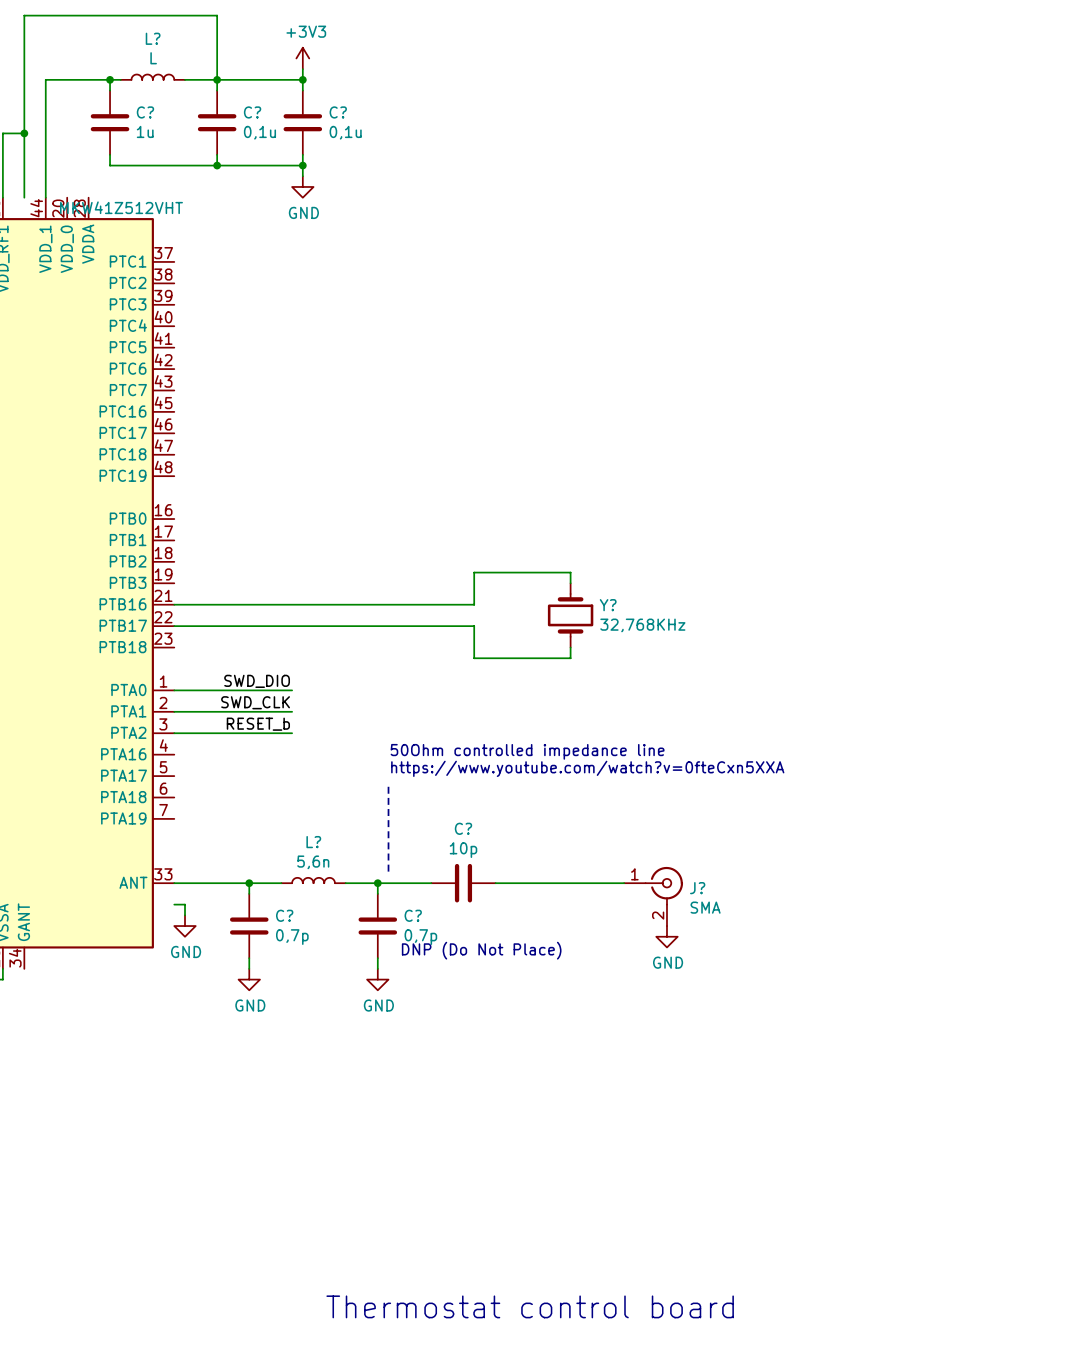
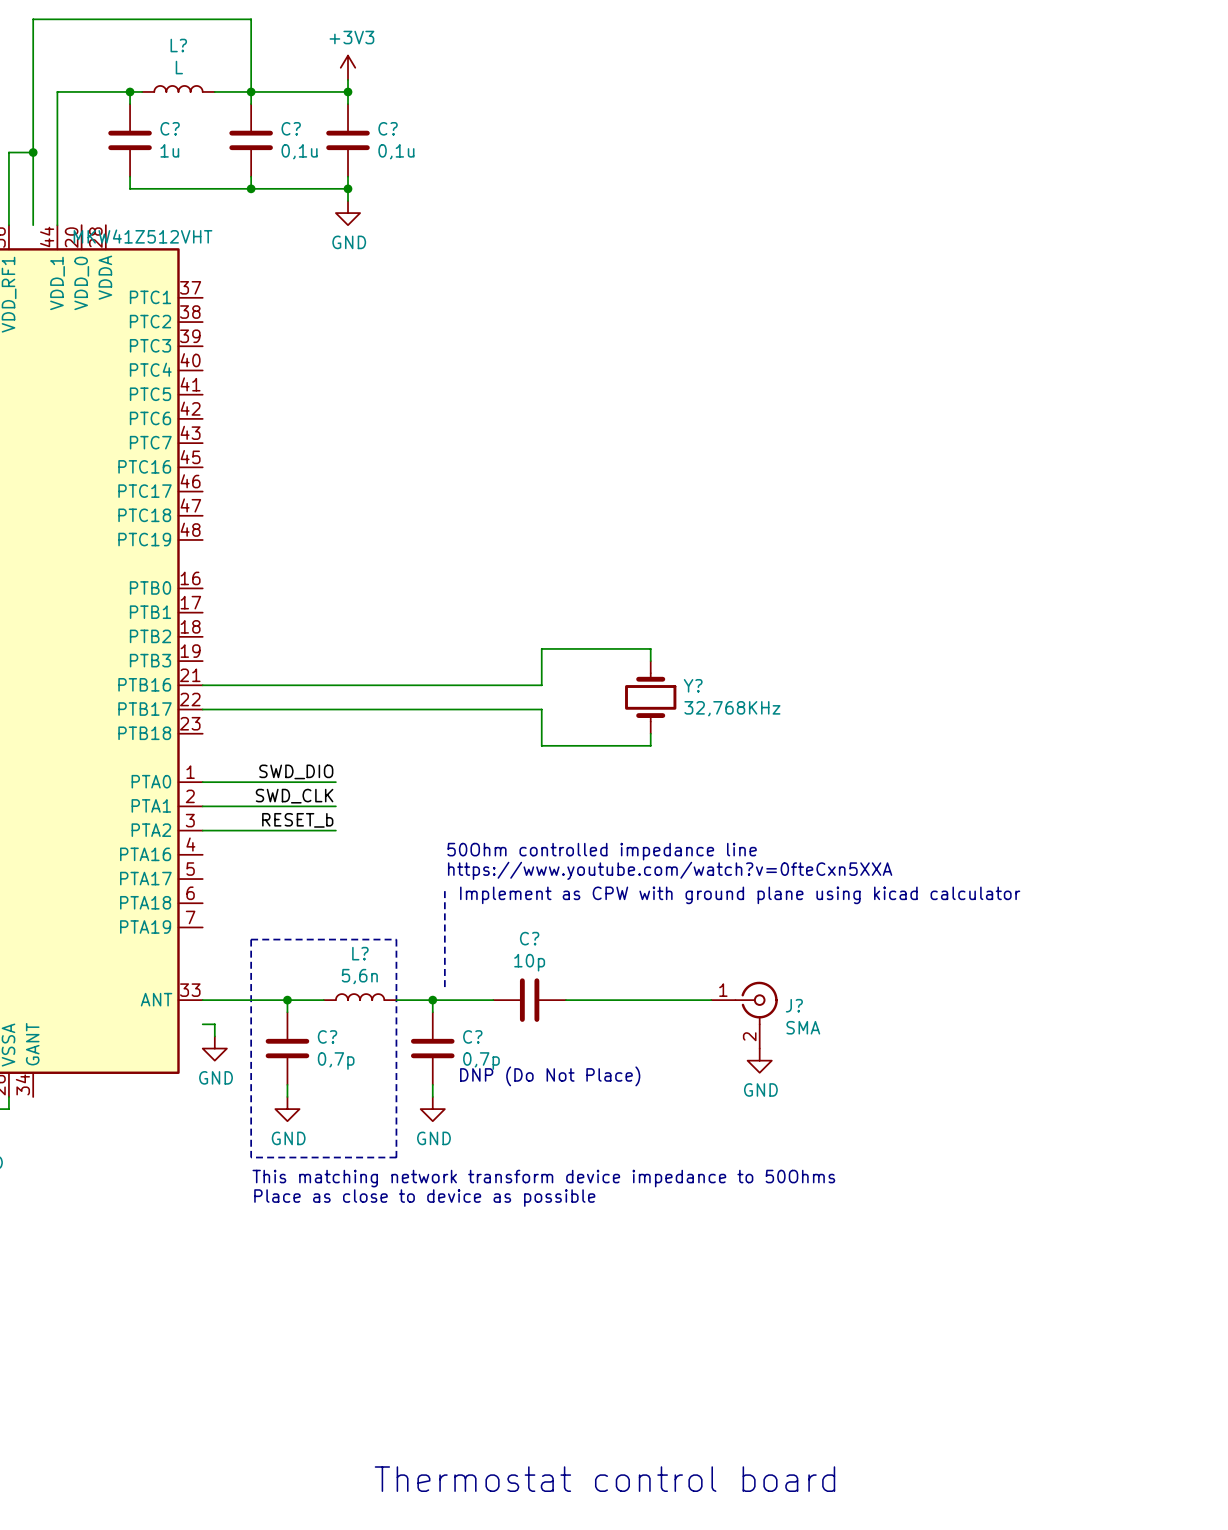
text: none -> Implement as CPW with ground plane using kicad calculator (740, 895)
line: none -> (251, 939) (396, 939) (396, 1157) (251, 1157) (251, 939)
text: none -> This matching network transform device impedance to 50Ohms (543, 1178)
text: none -> Place as close to device as possible (424, 1198)

